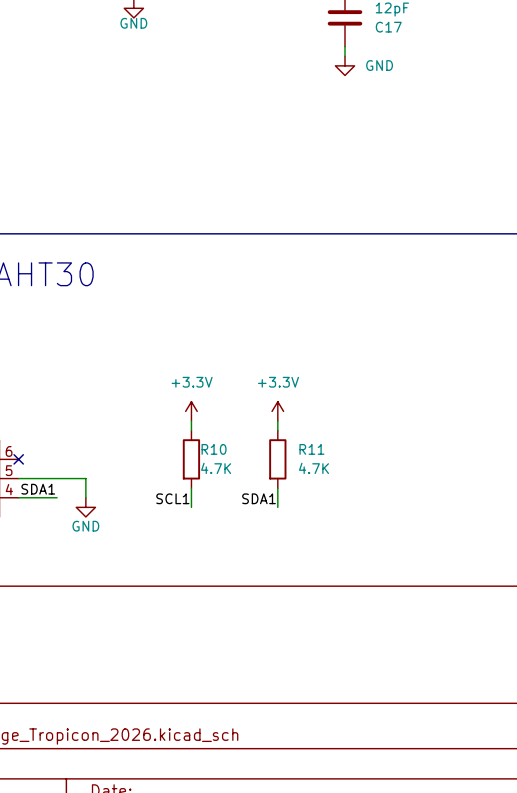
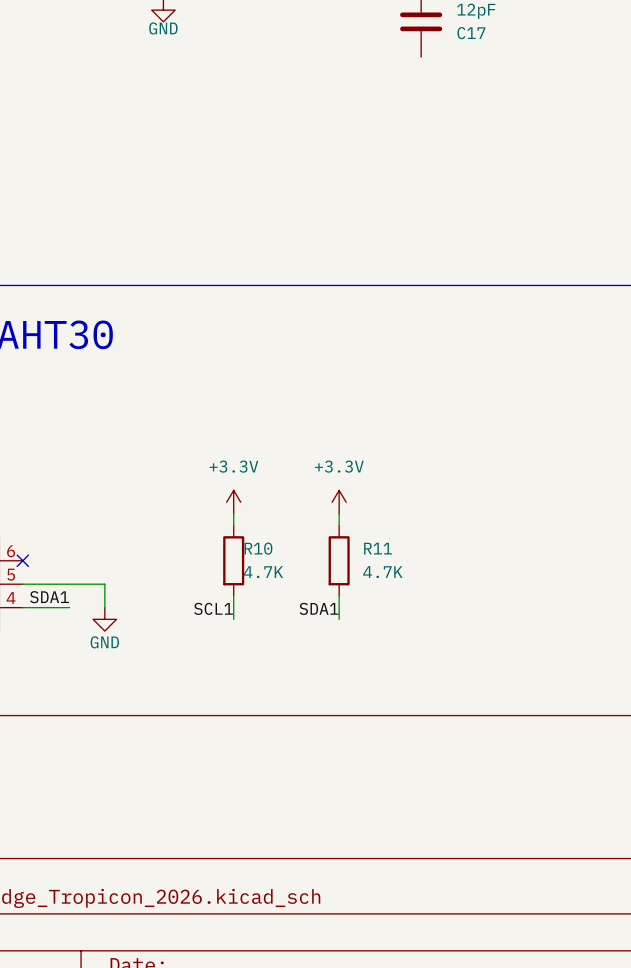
wire: (345, 46) (345, 56) -> none
power symbol: GND (345, 65) -> none

